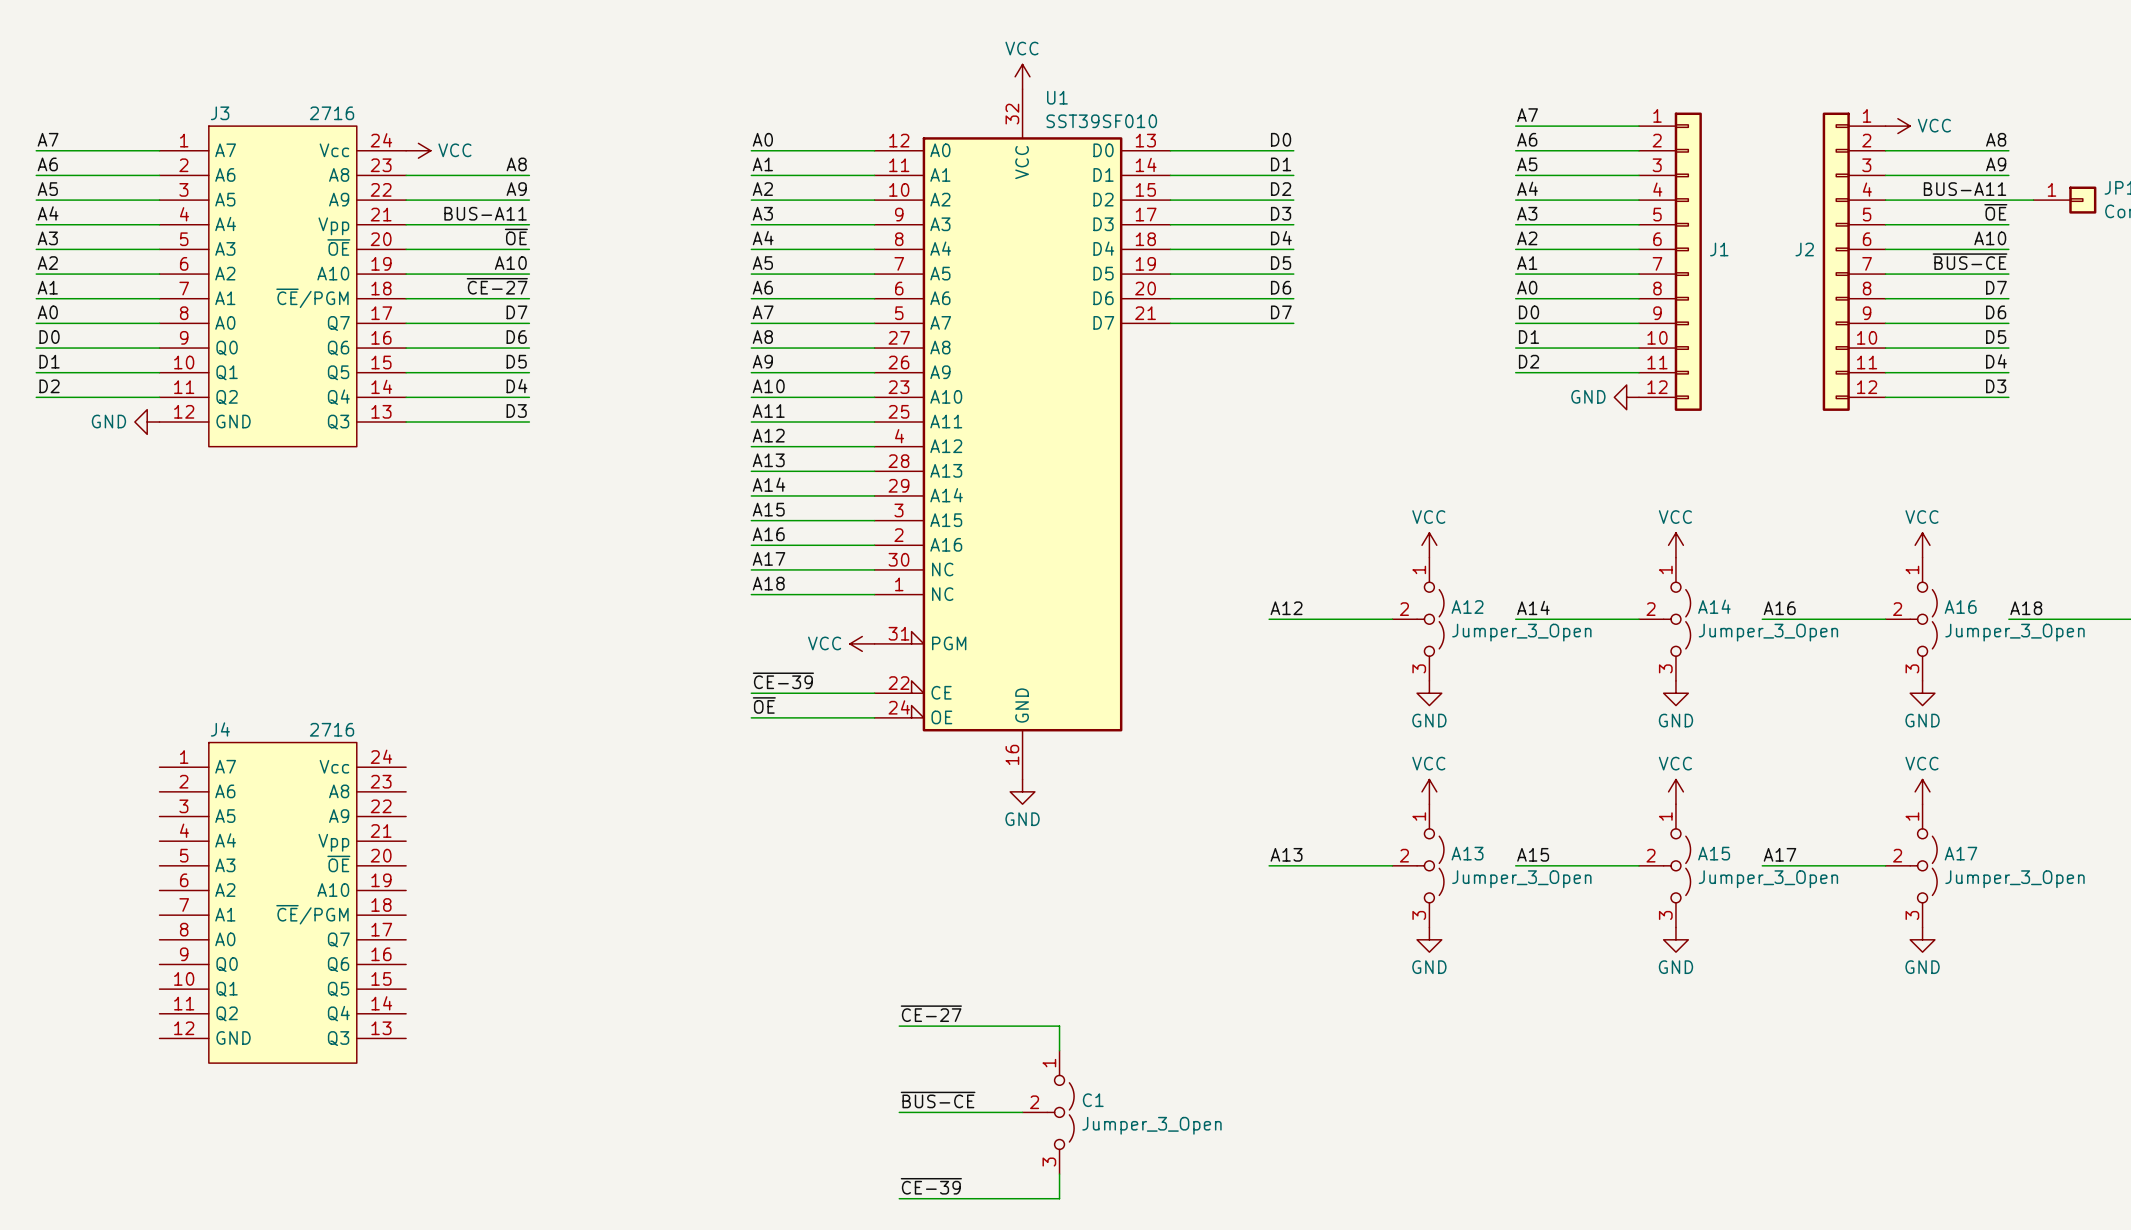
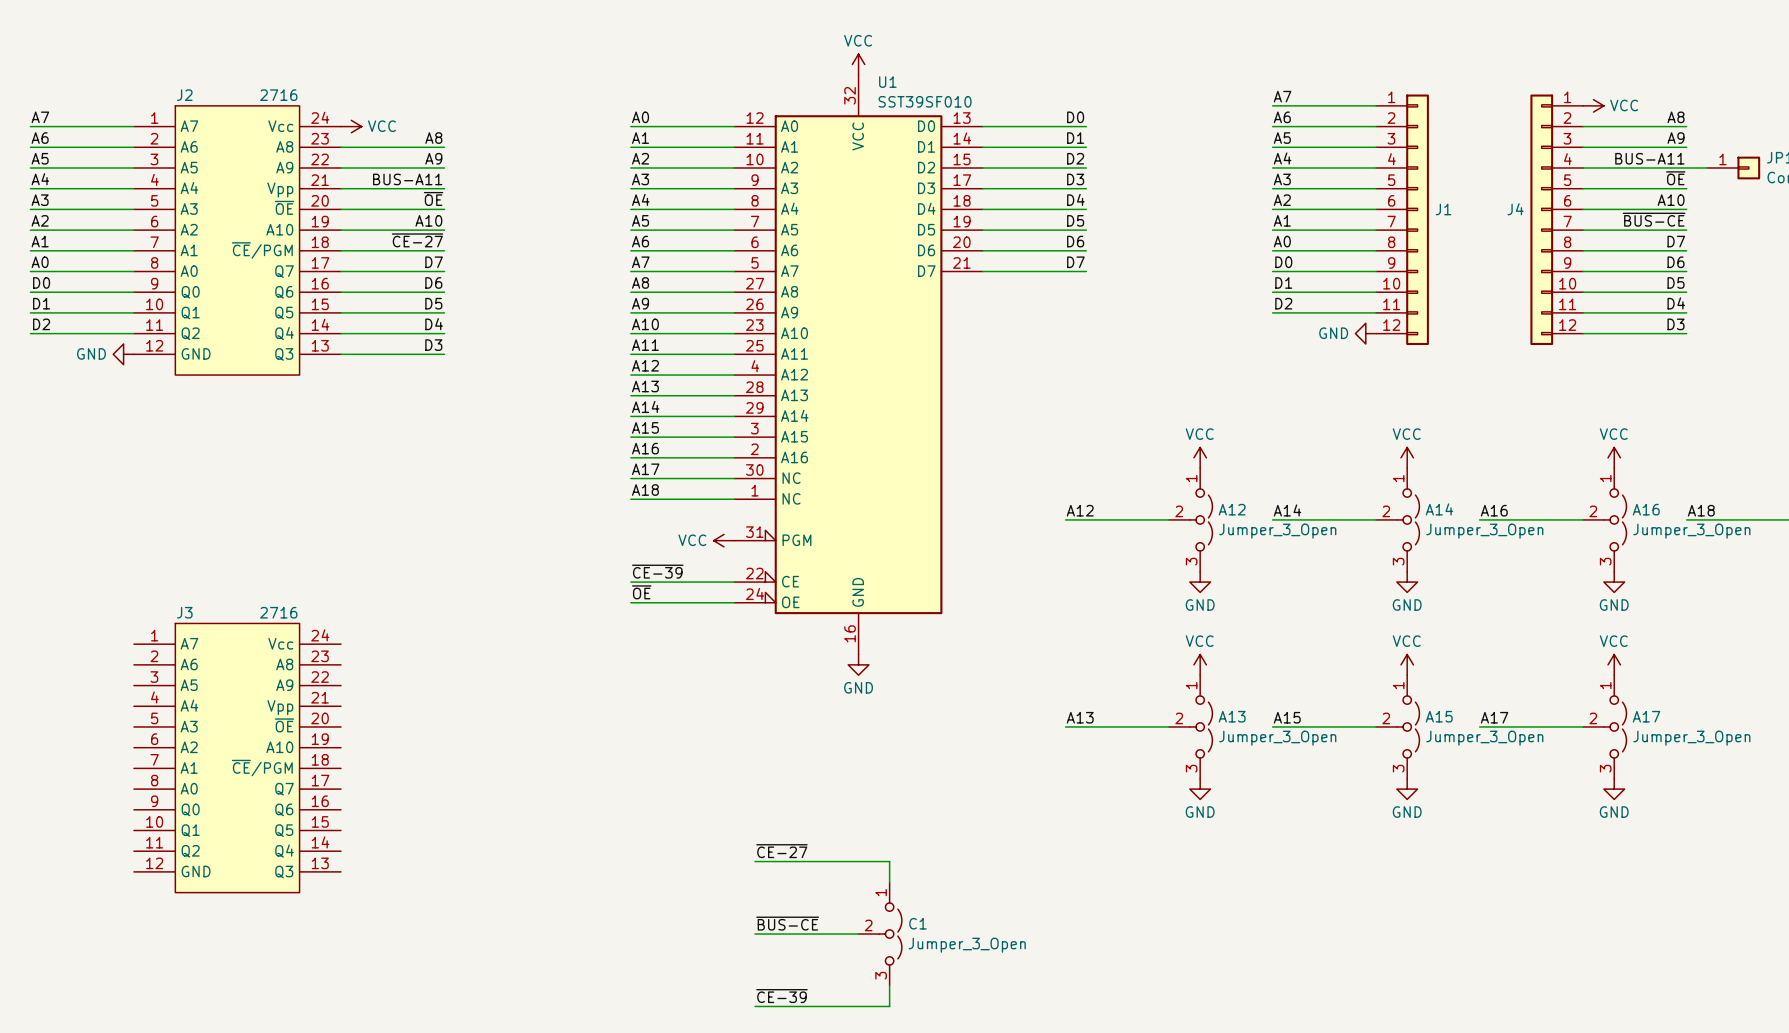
J3 name: J3 (220, 113) -> J2 (184, 95)
J2 name: J2 (1804, 249) -> J4 (1515, 209)
J4 name: J4 (220, 729) -> J3 (184, 612)

